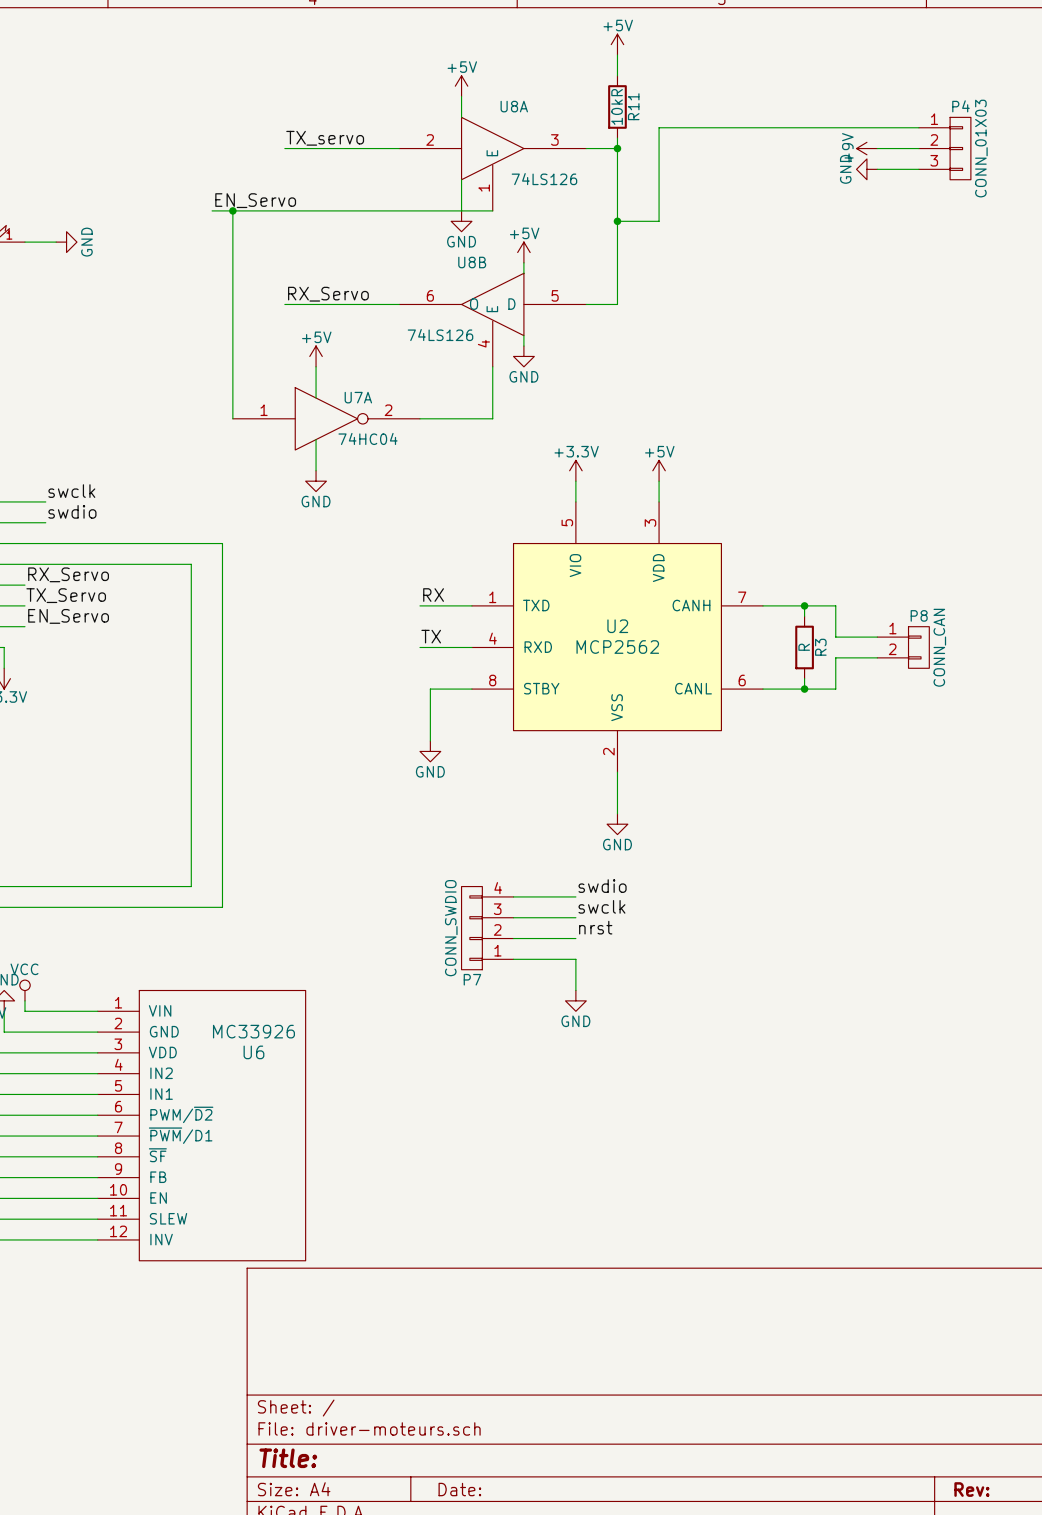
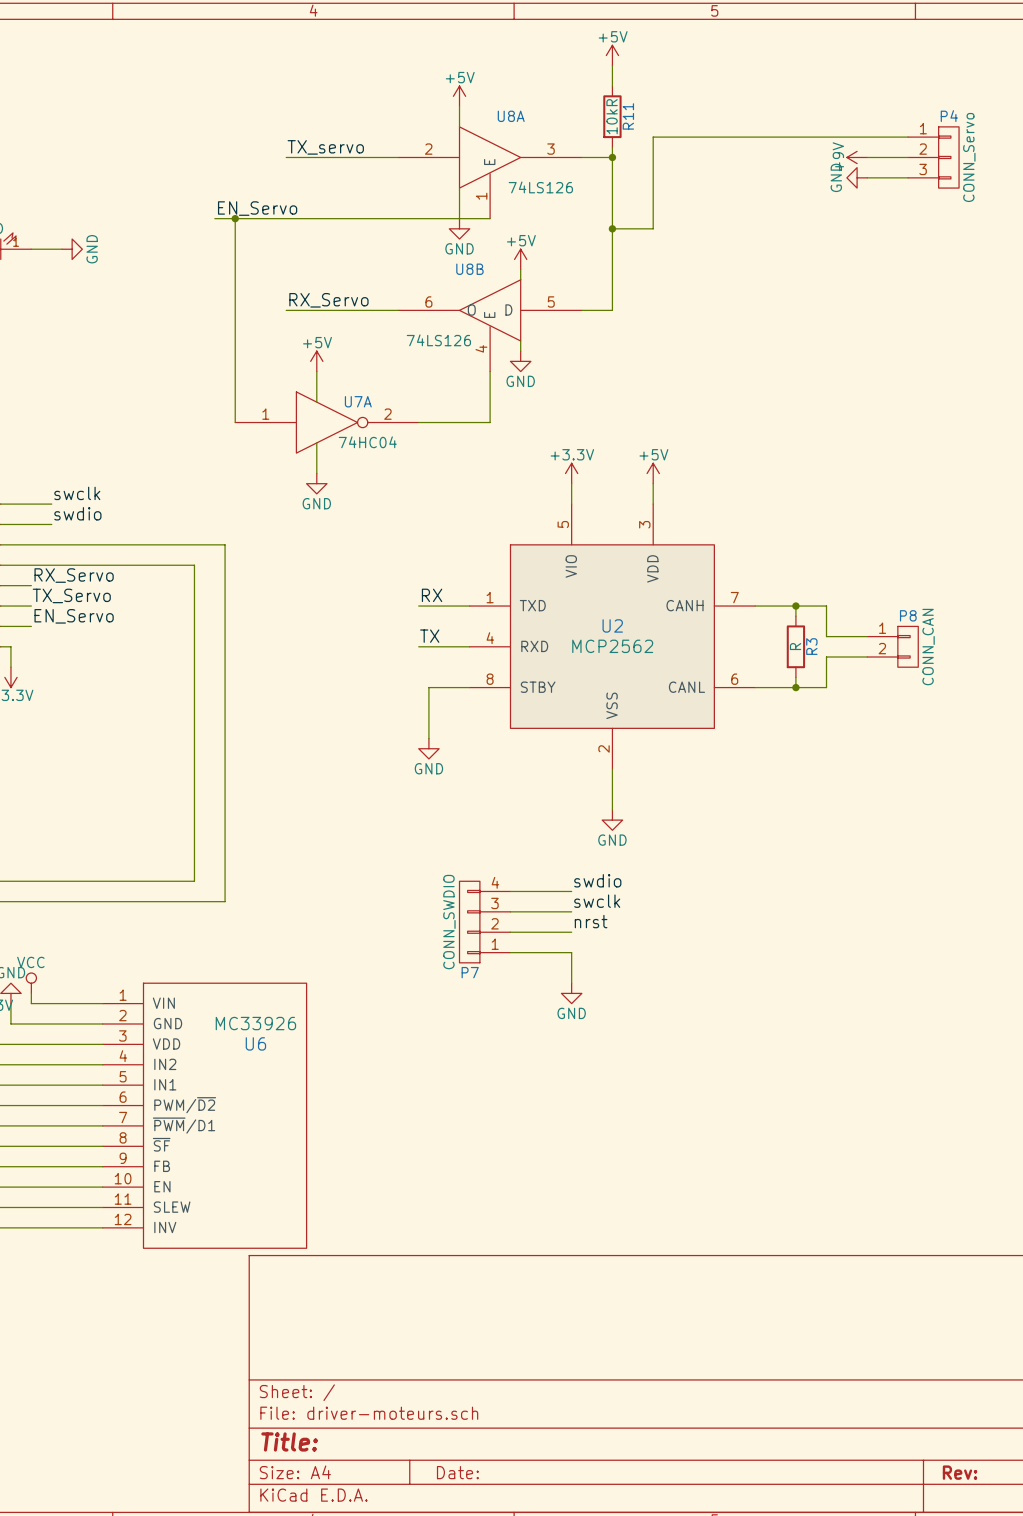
P4 value: CONN_01X03 (981, 148) -> CONN_Servo (969, 157)

